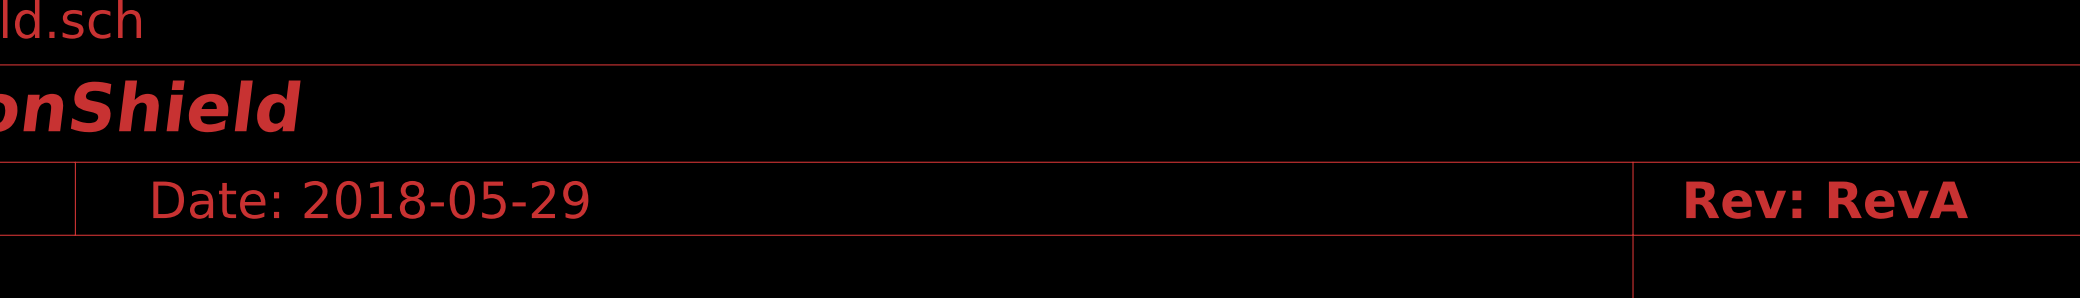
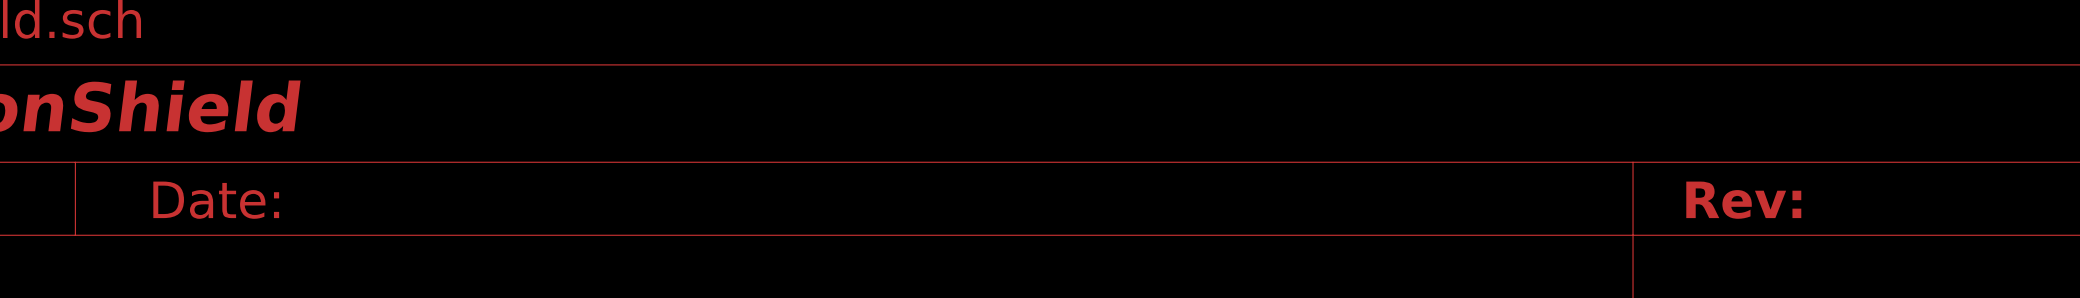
title block: Date: 2018-05-29 (370, 199) -> Date: (216, 200)
title block: Rev: RevA (1827, 200) -> Rev: (1743, 200)

